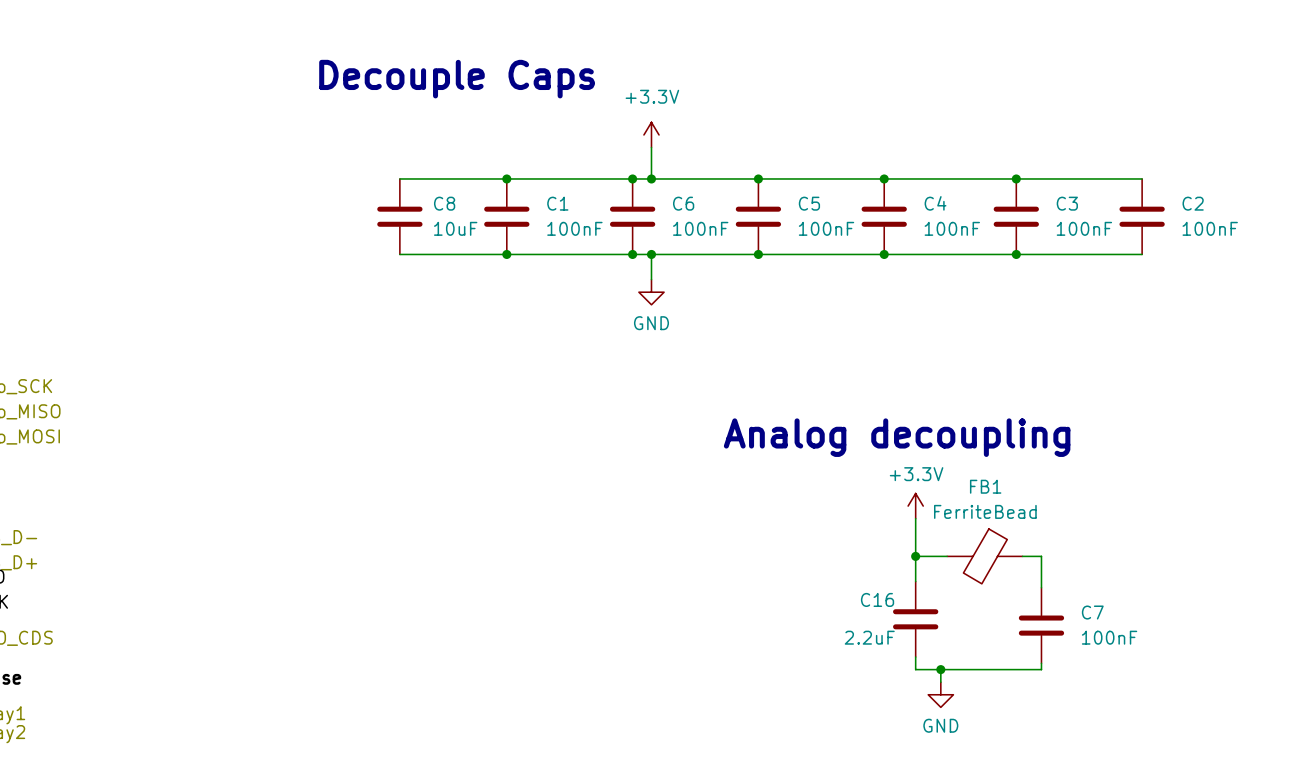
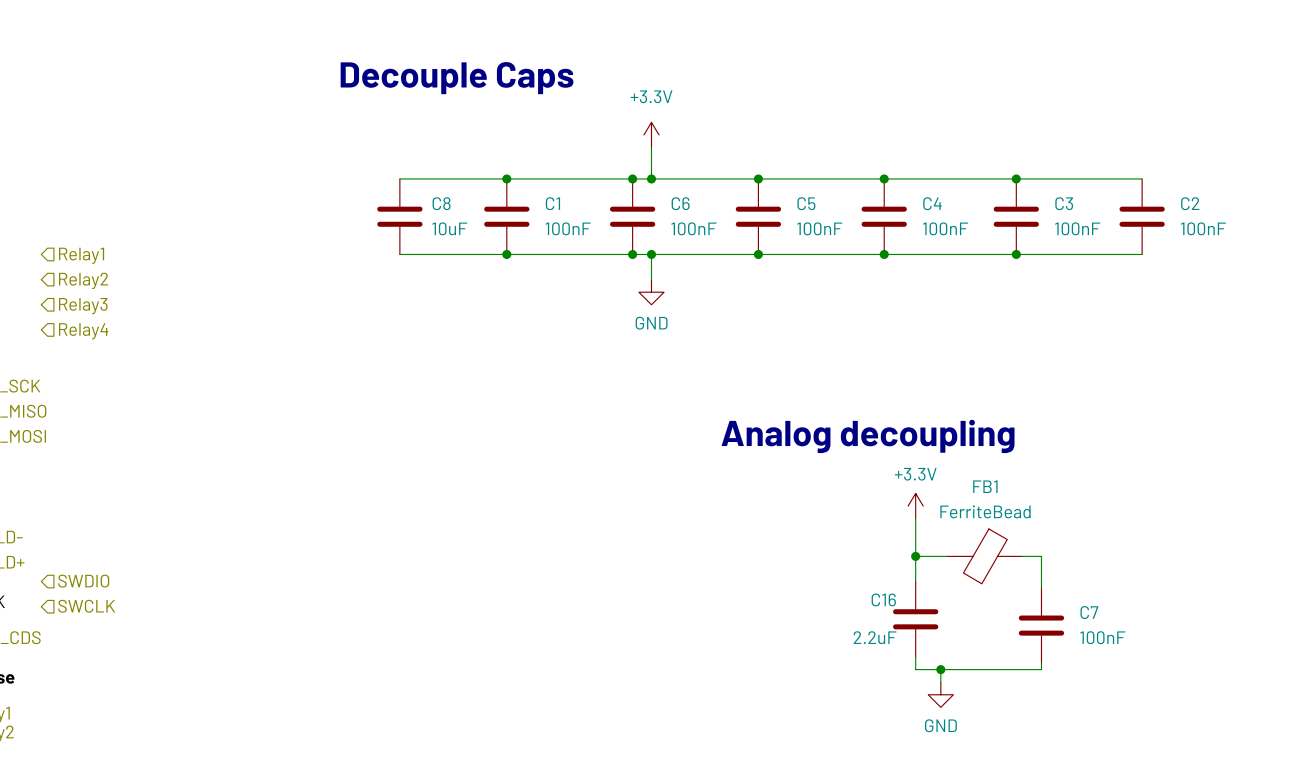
hierarchical label: none -> Relay1 (81, 255)
hierarchical label: none -> Relay2 (83, 280)
hierarchical label: none -> Relay3 (83, 306)
hierarchical label: none -> Relay4 (83, 331)
hierarchical label: none -> SWDIO (83, 581)
hierarchical label: none -> SWCLK (86, 606)

